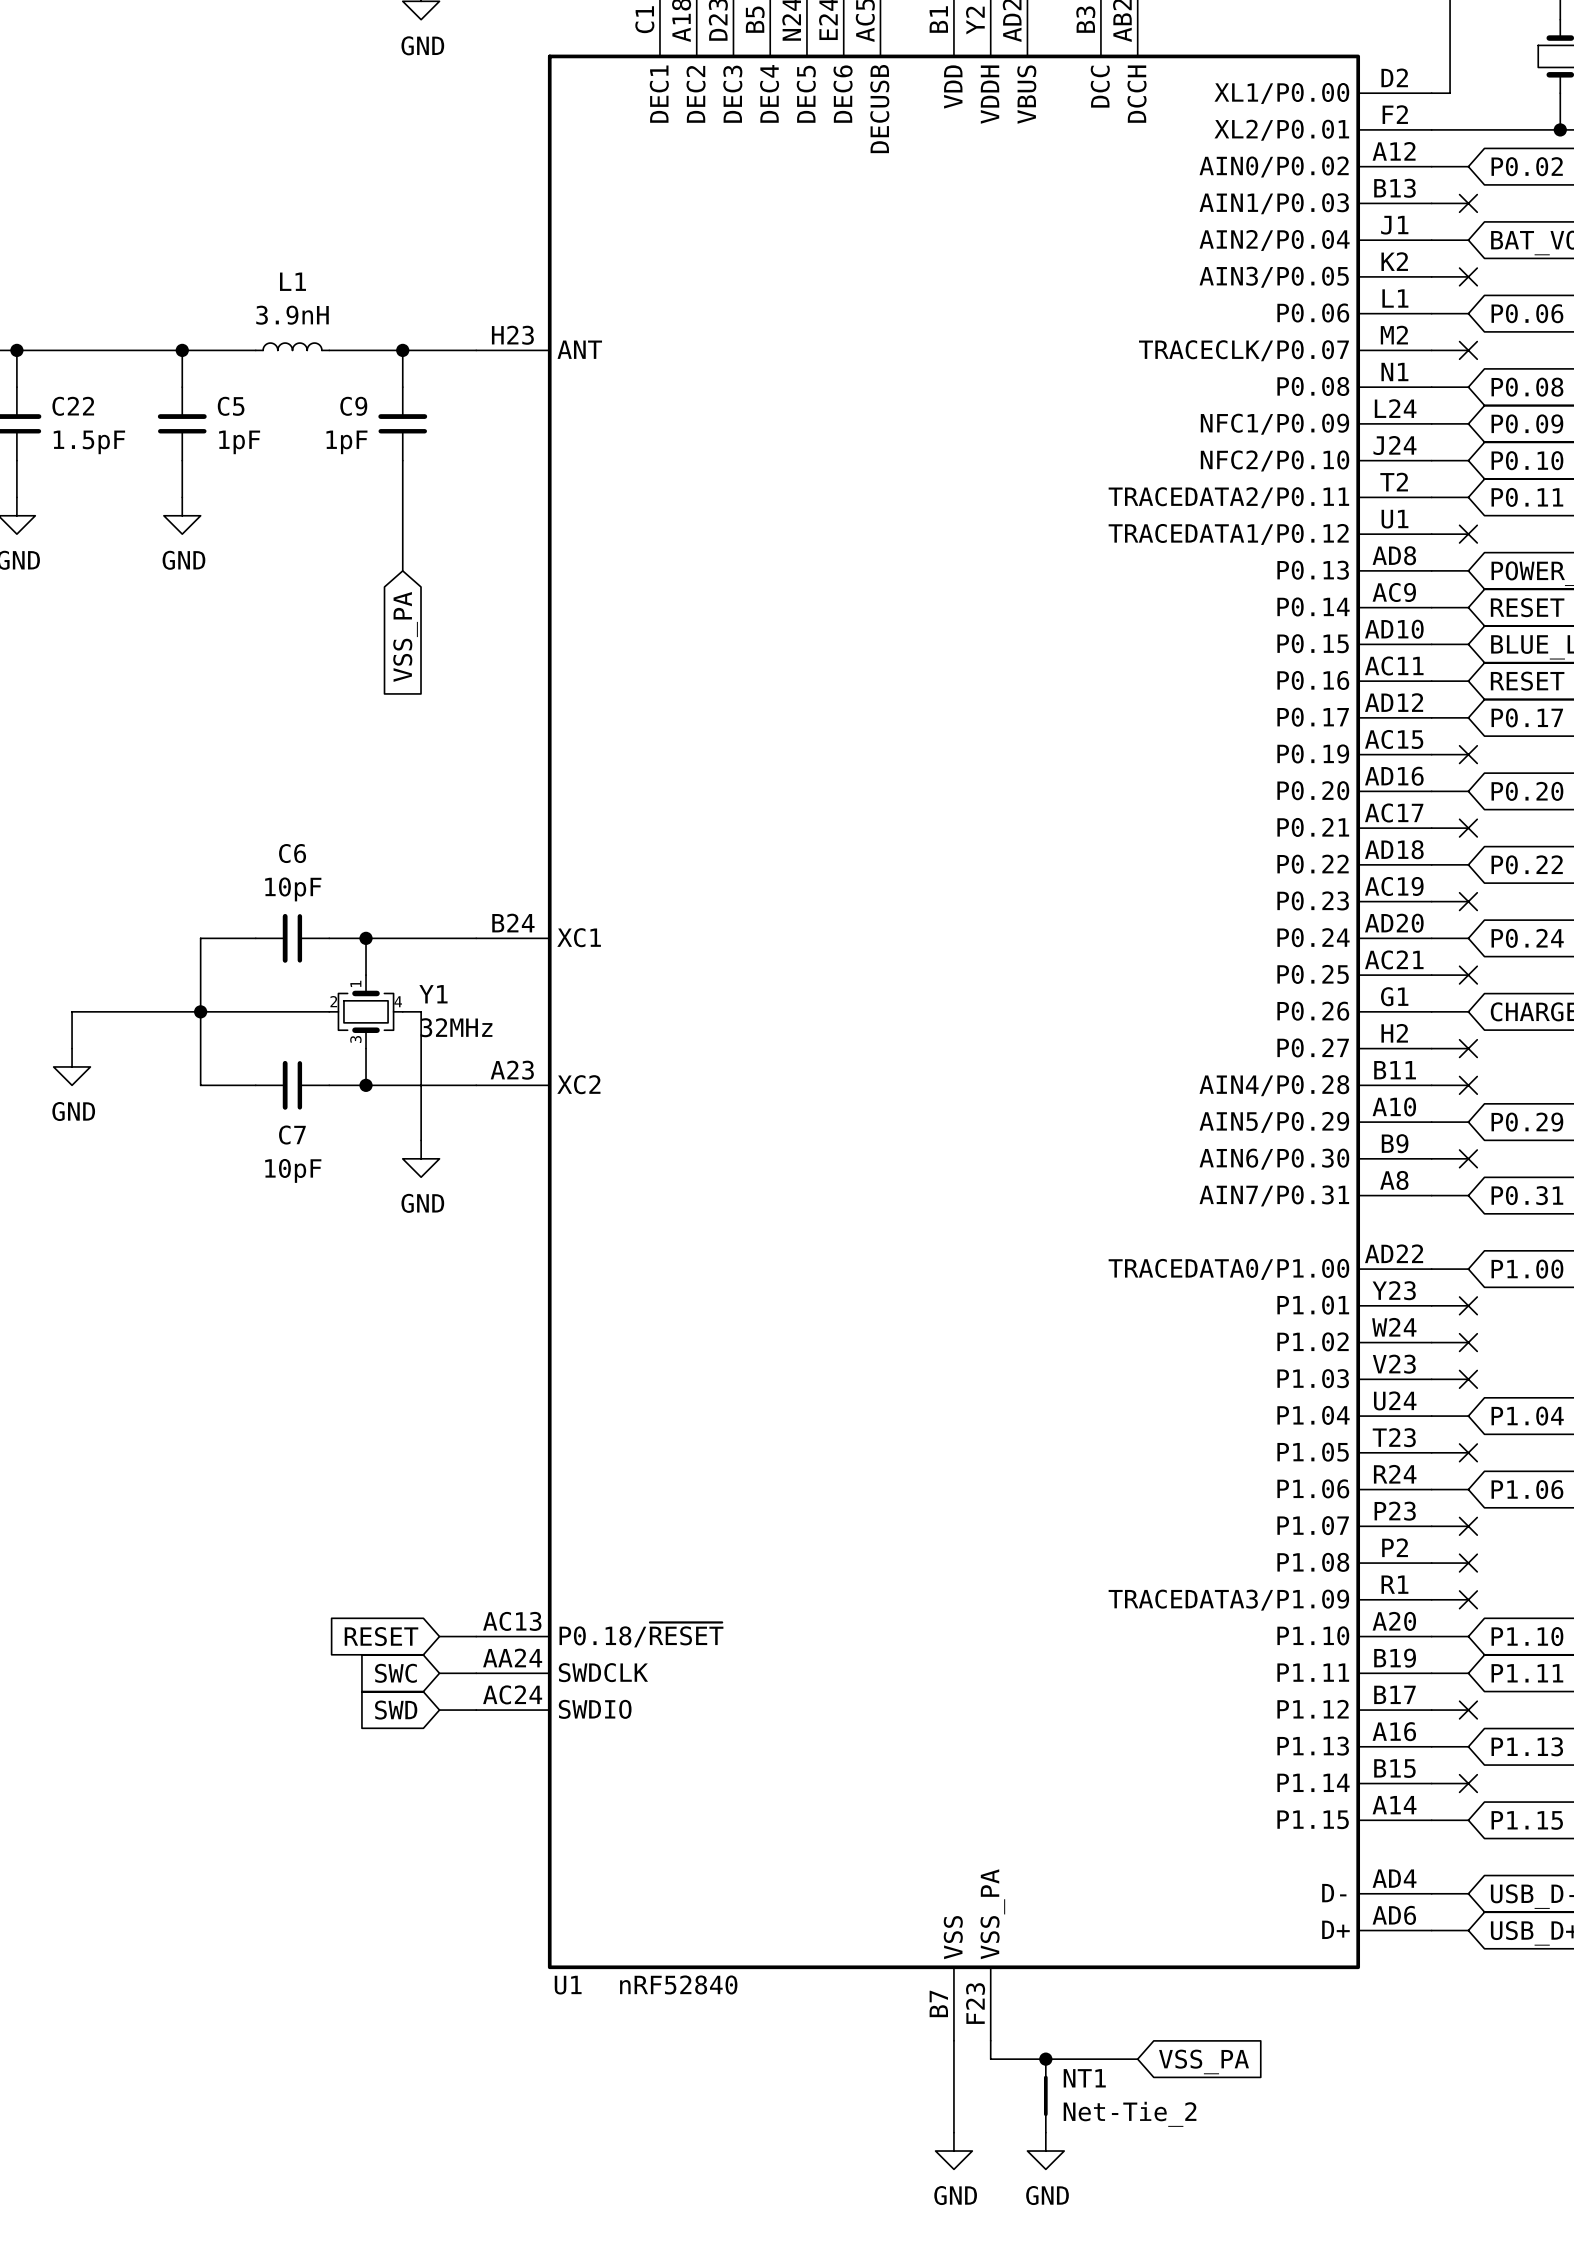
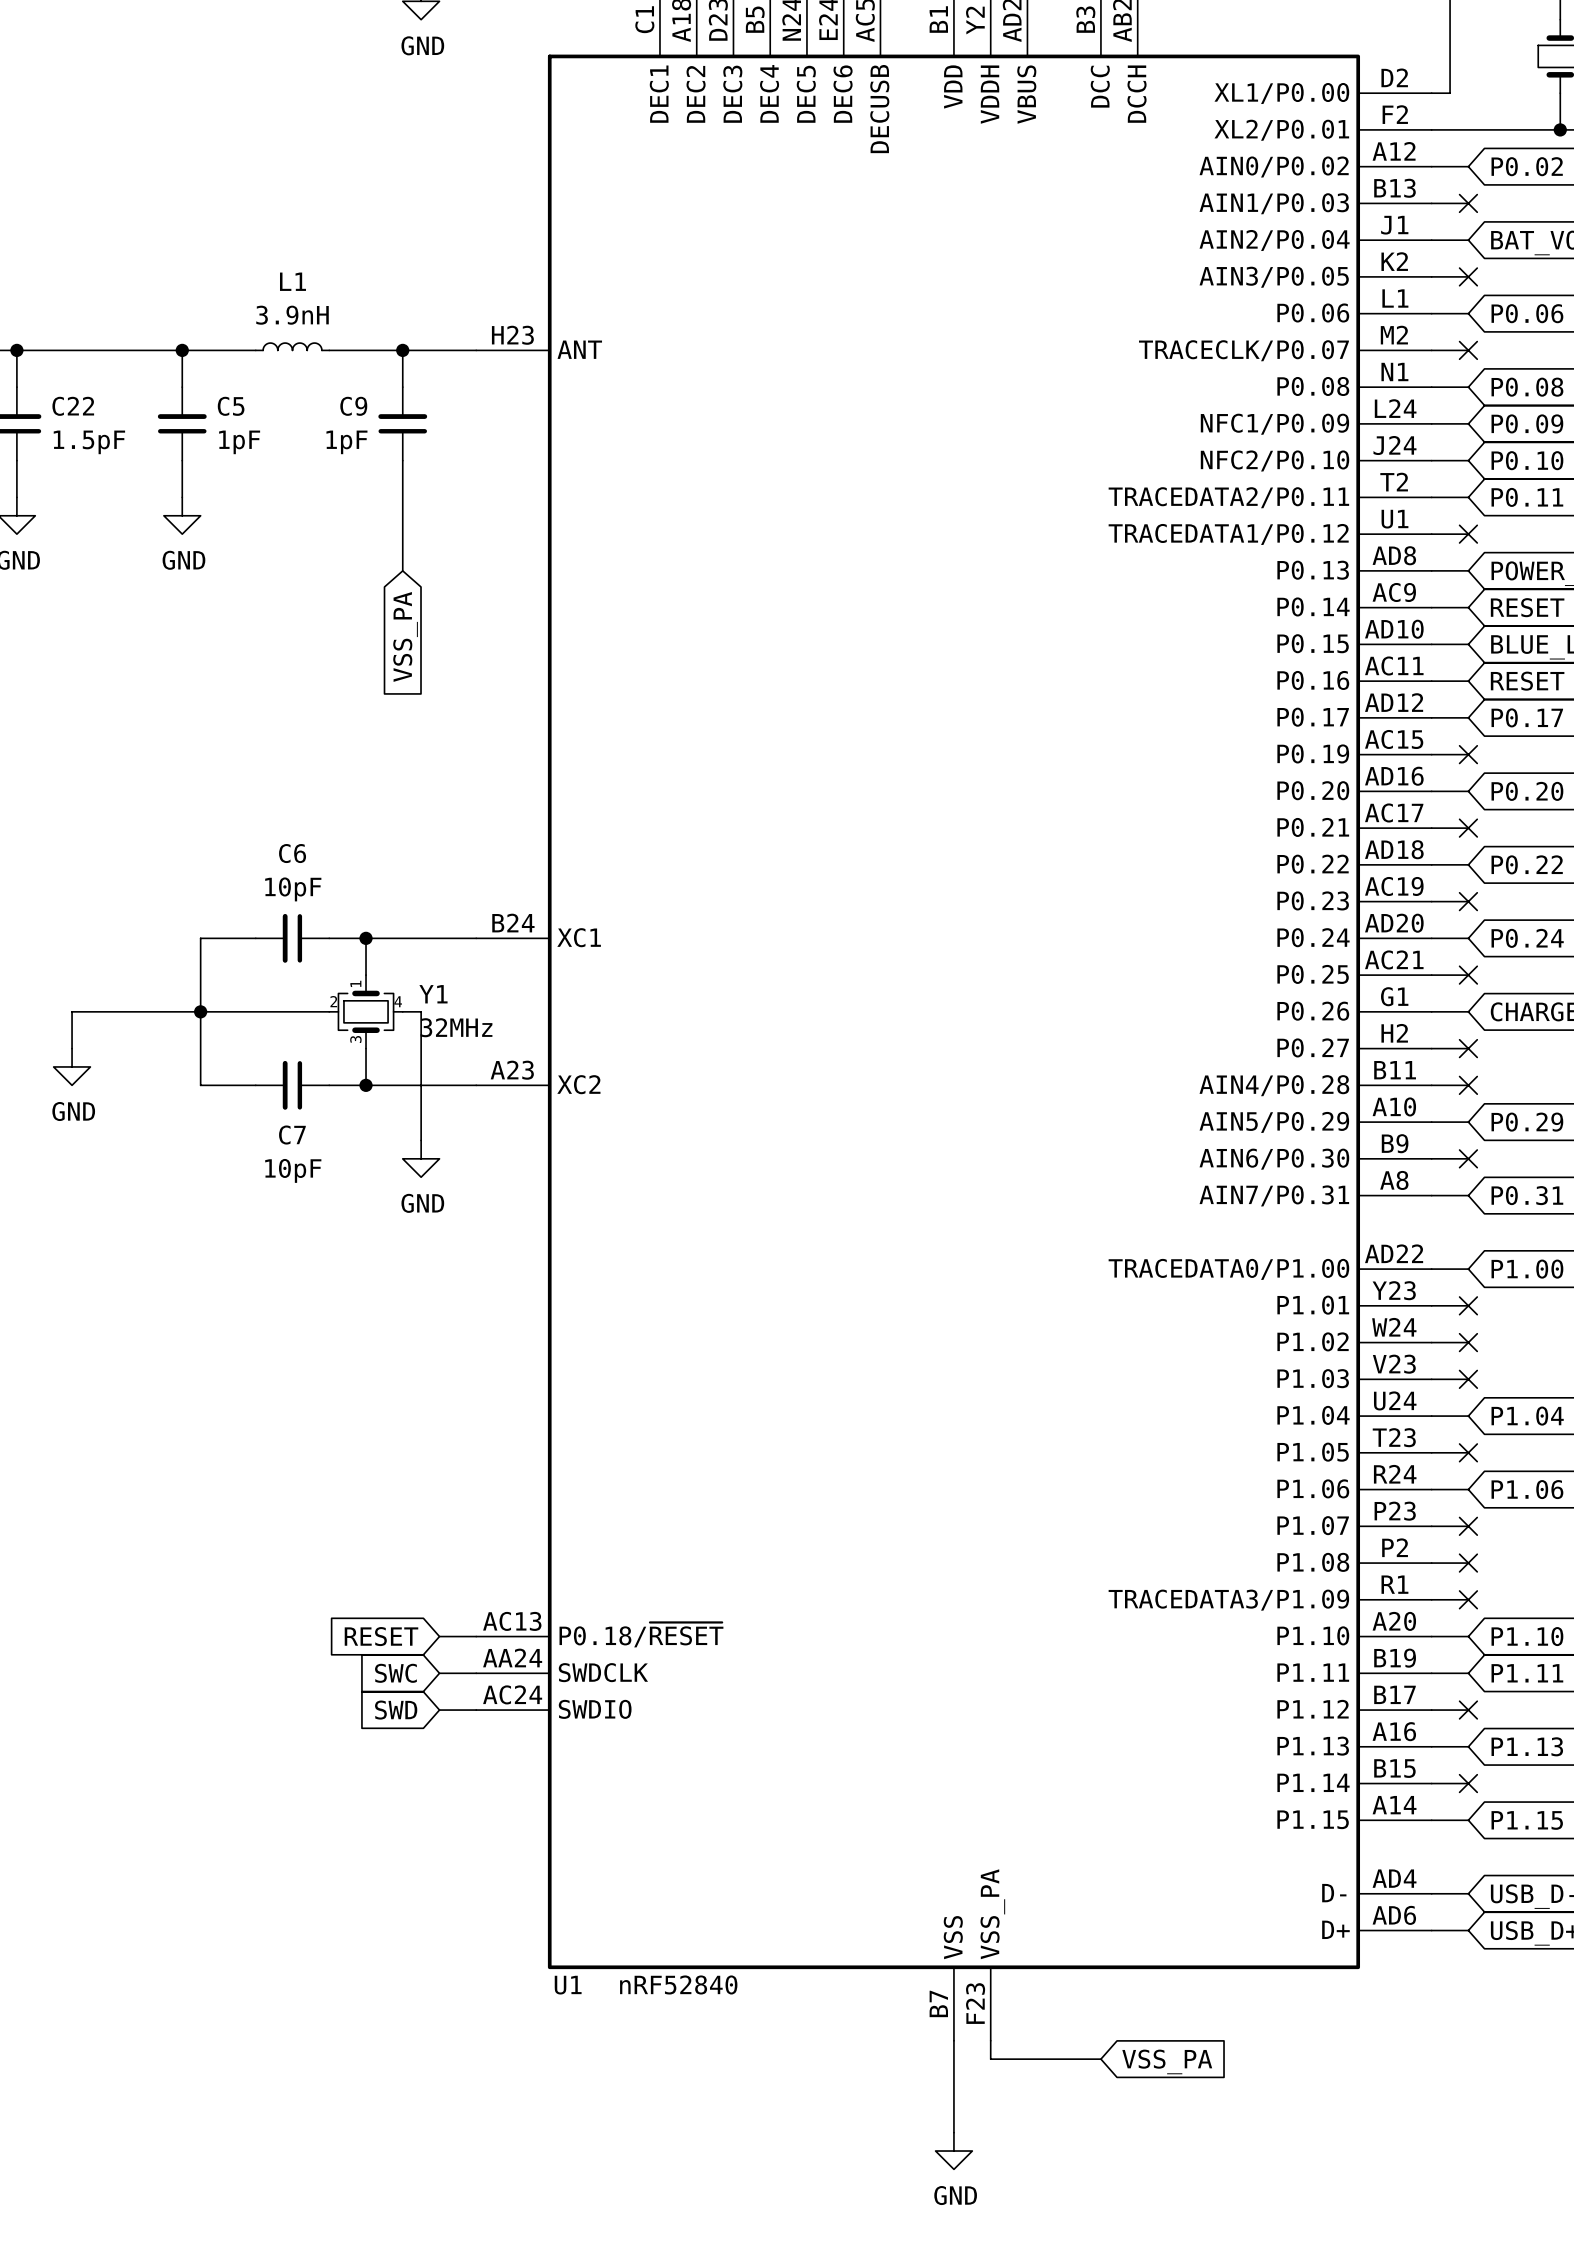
junction: (1045, 2059) -> none
wire: (1100, 2059) (1137, 2059) -> none
global label position: VSS_PA (1204, 2061) -> VSS_PA (1167, 2061)
NT1: Net-Tie_2 (1045, 2095) -> none
power symbol: GND (1045, 2151) -> none

